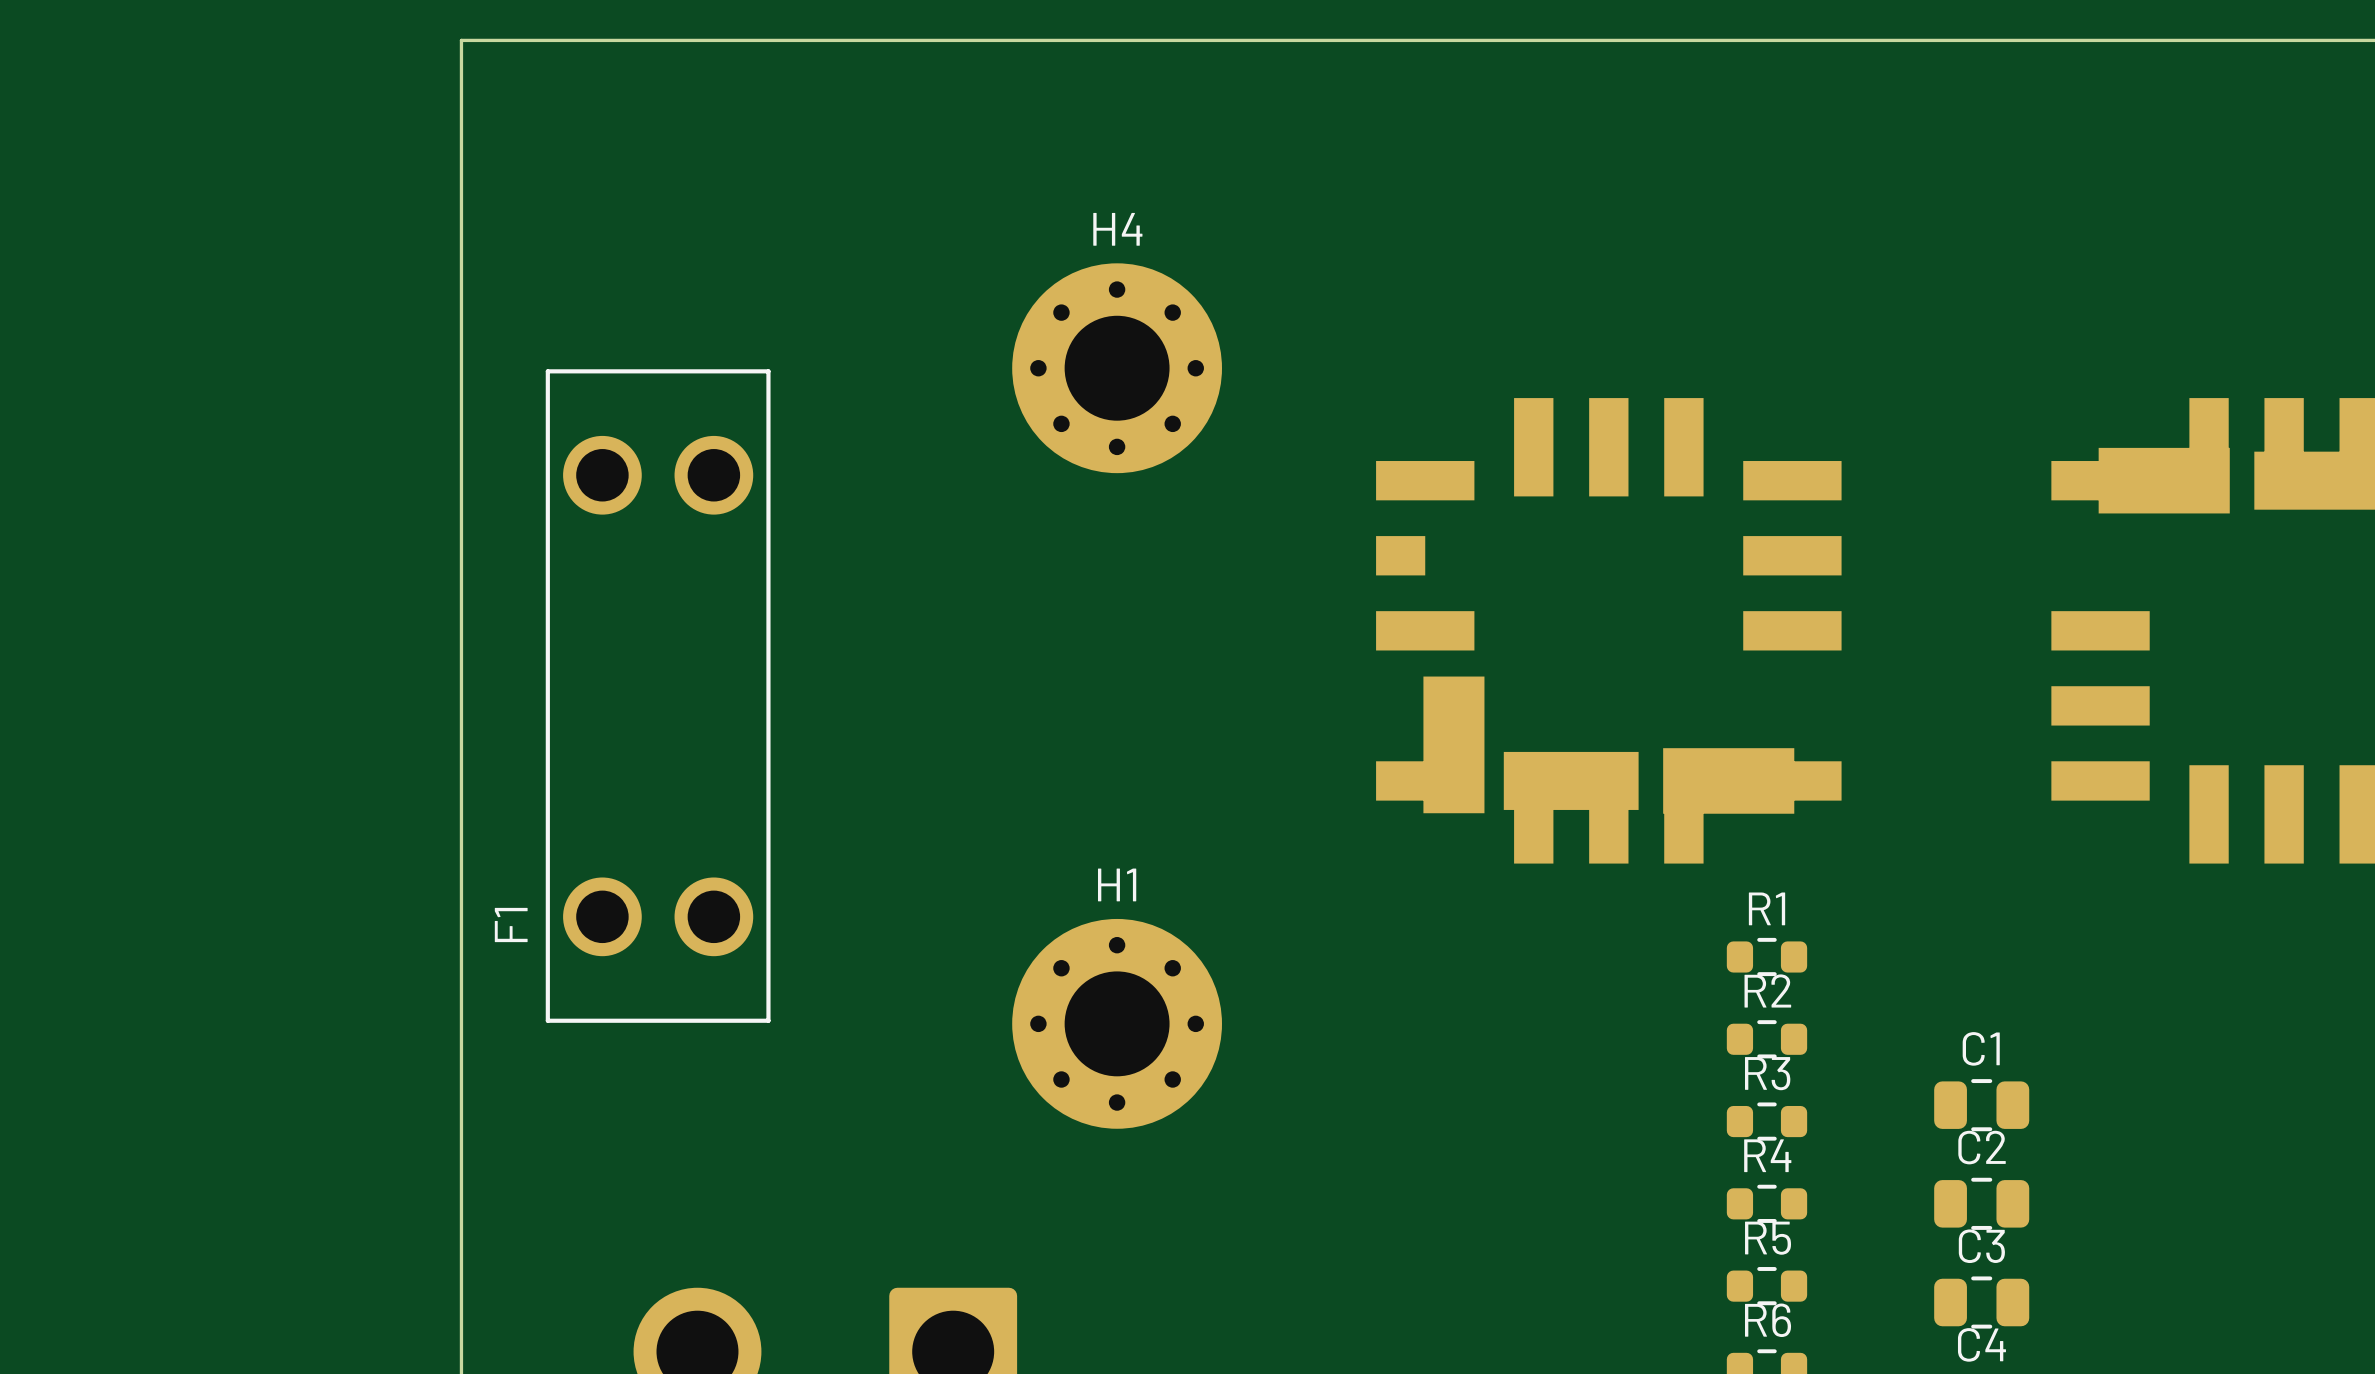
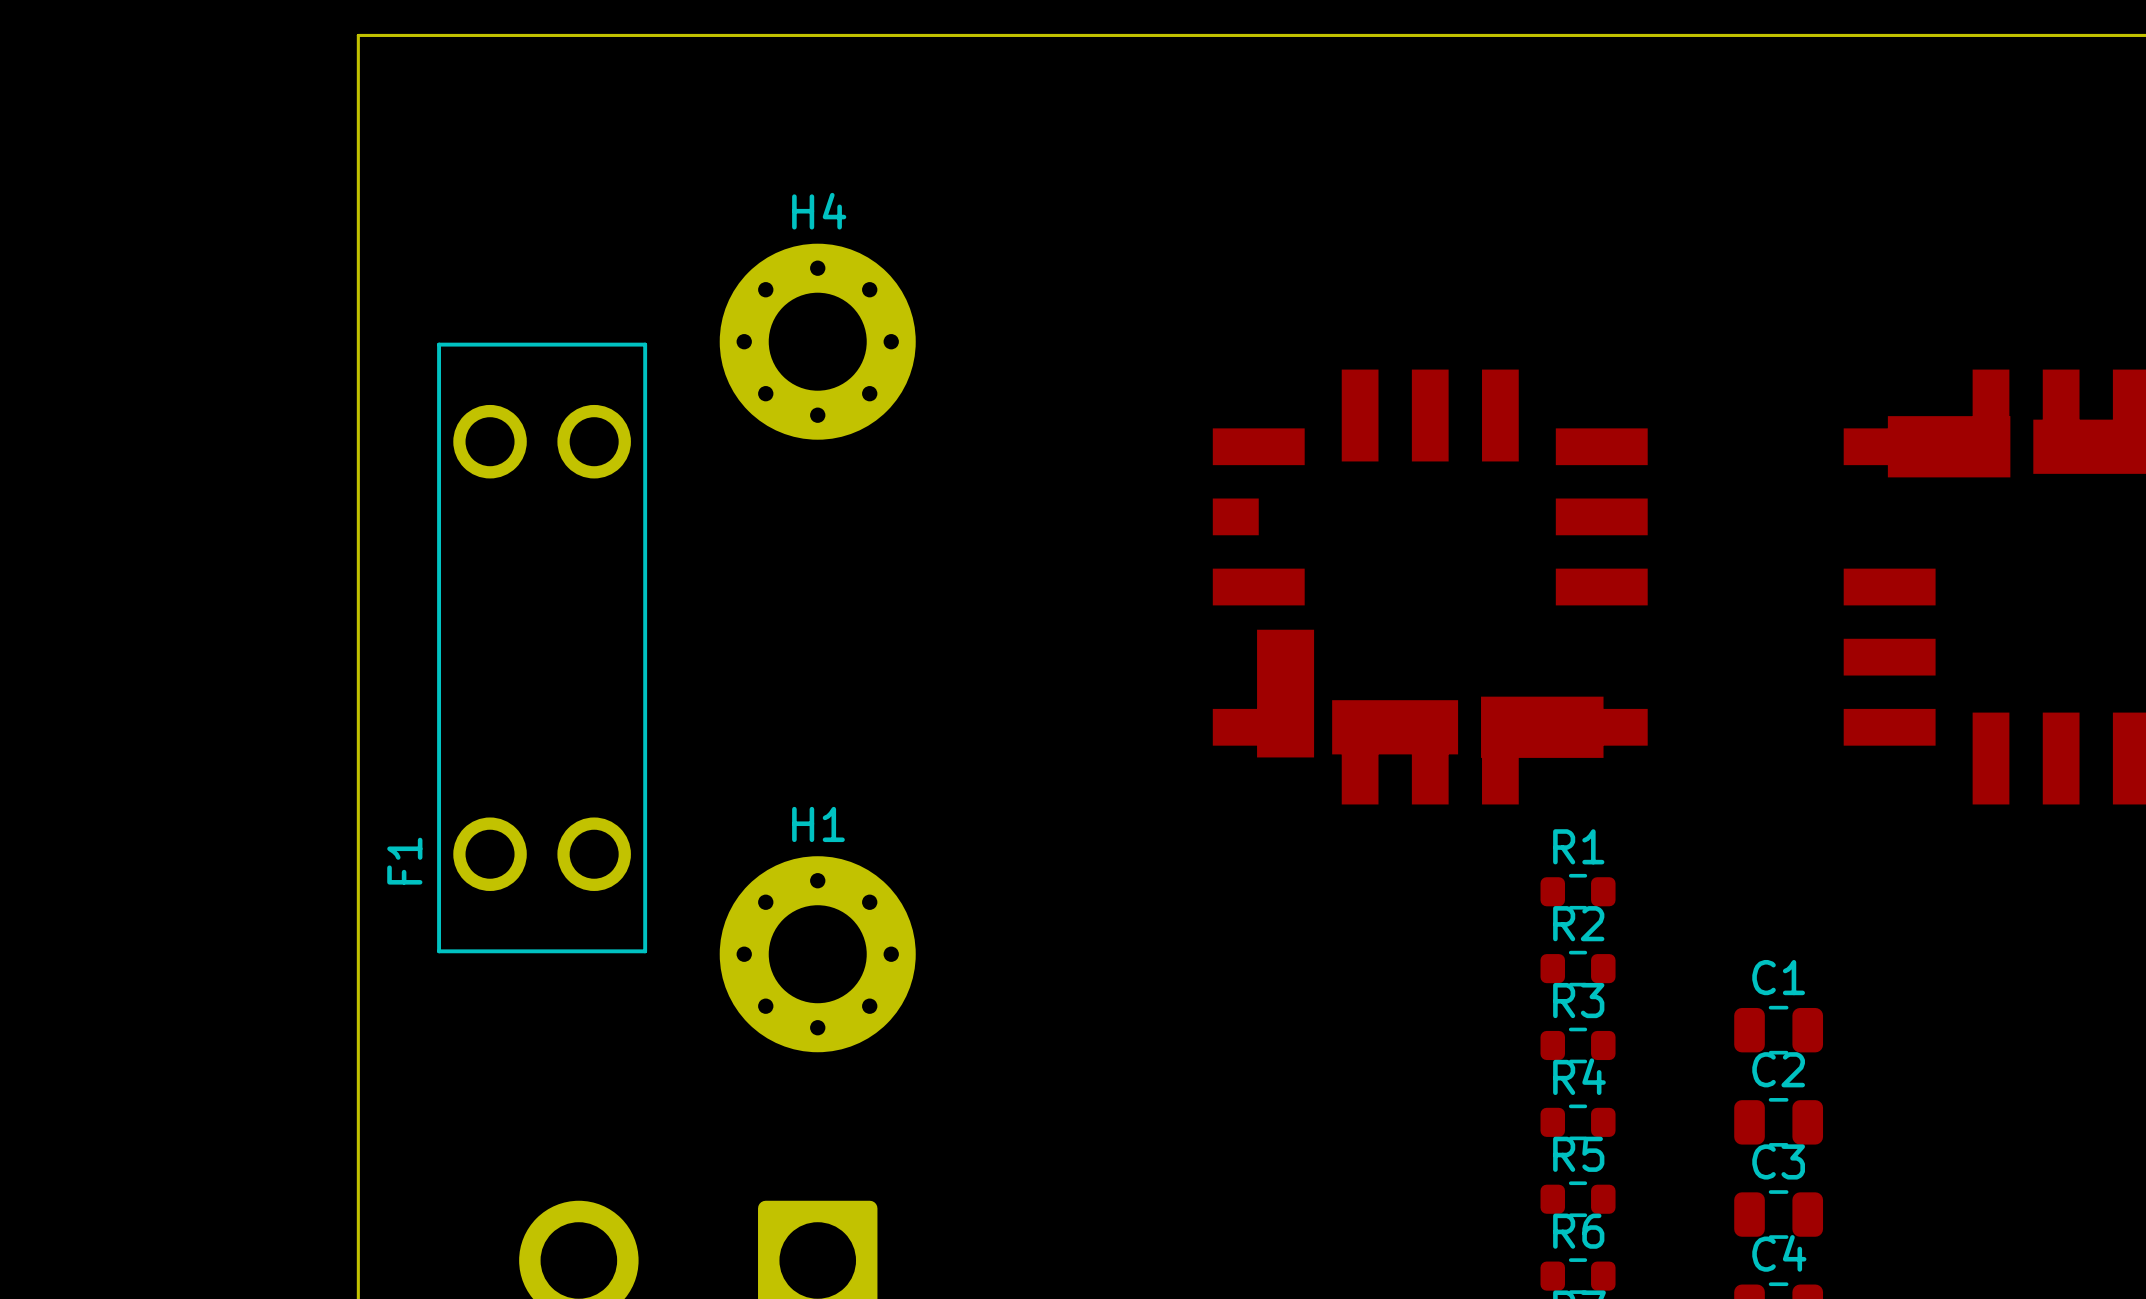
H4 position: (1117, 368) -> (817, 341)
H1 position: (1117, 1023) -> (817, 954)

